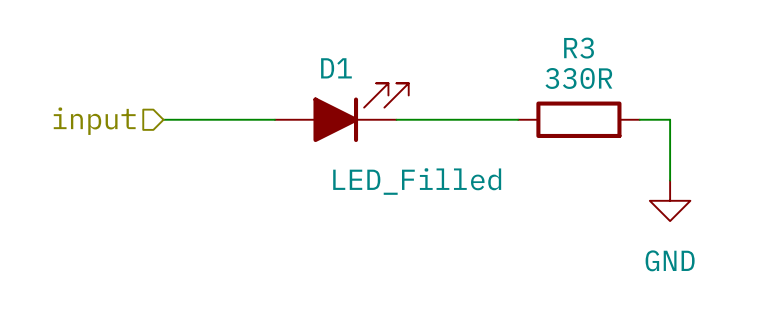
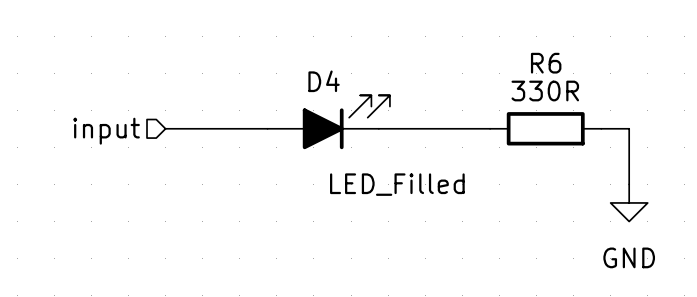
R3 name: R3 (579, 48) -> R6 (546, 63)
D1 name: D1 (336, 68) -> D4 (324, 81)

